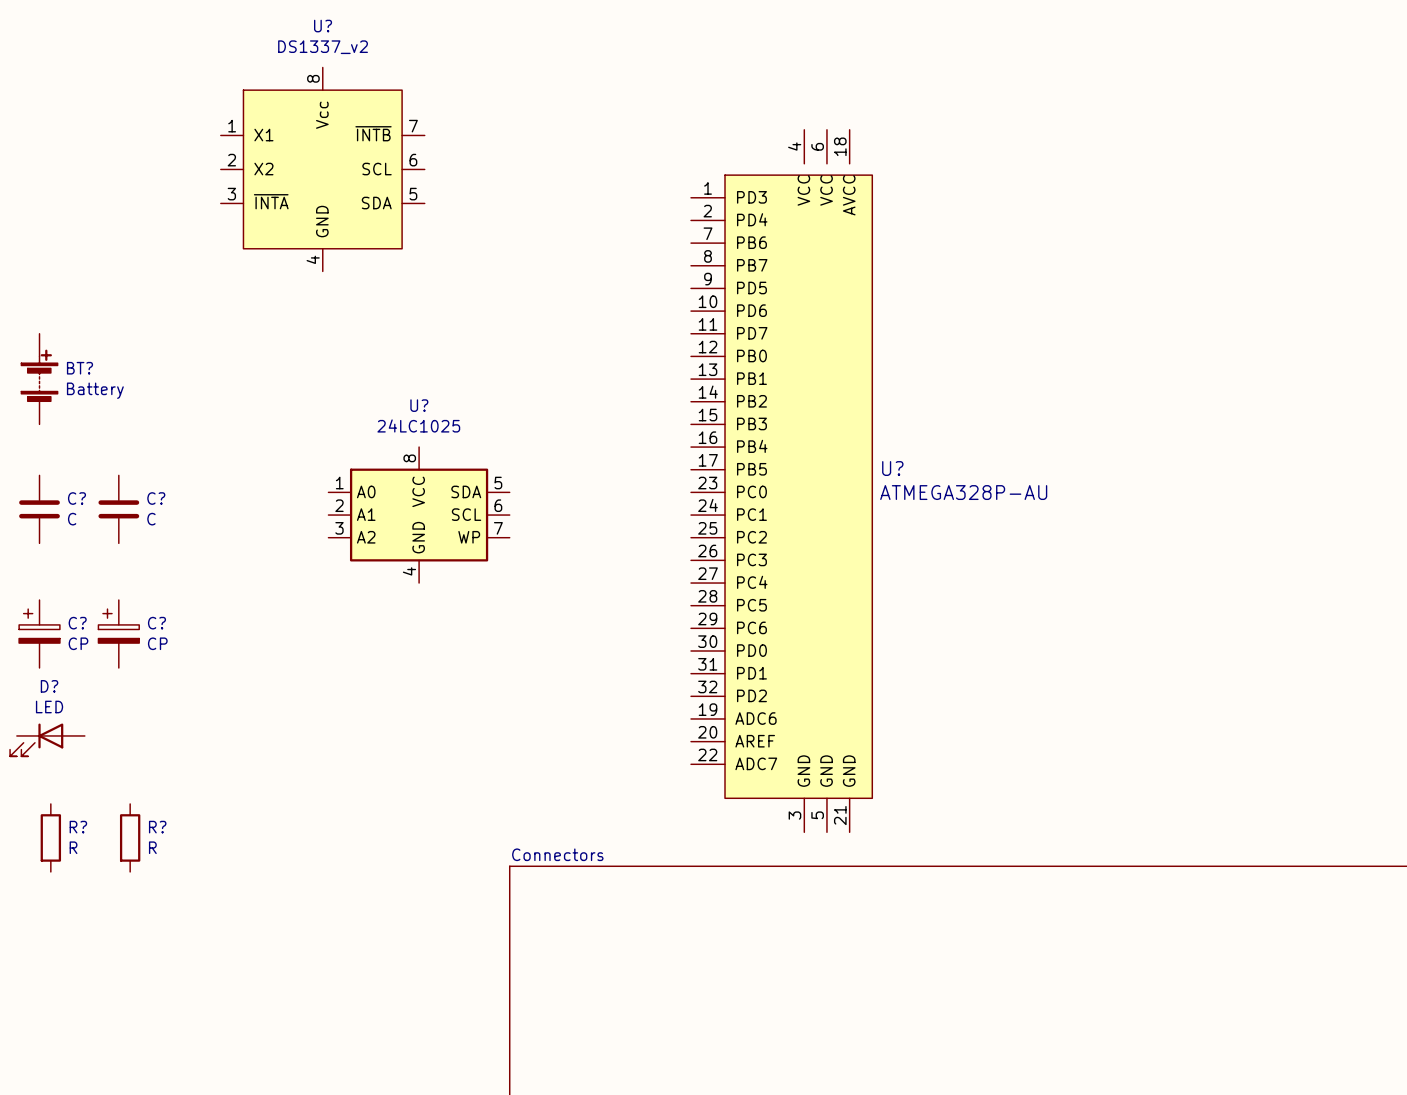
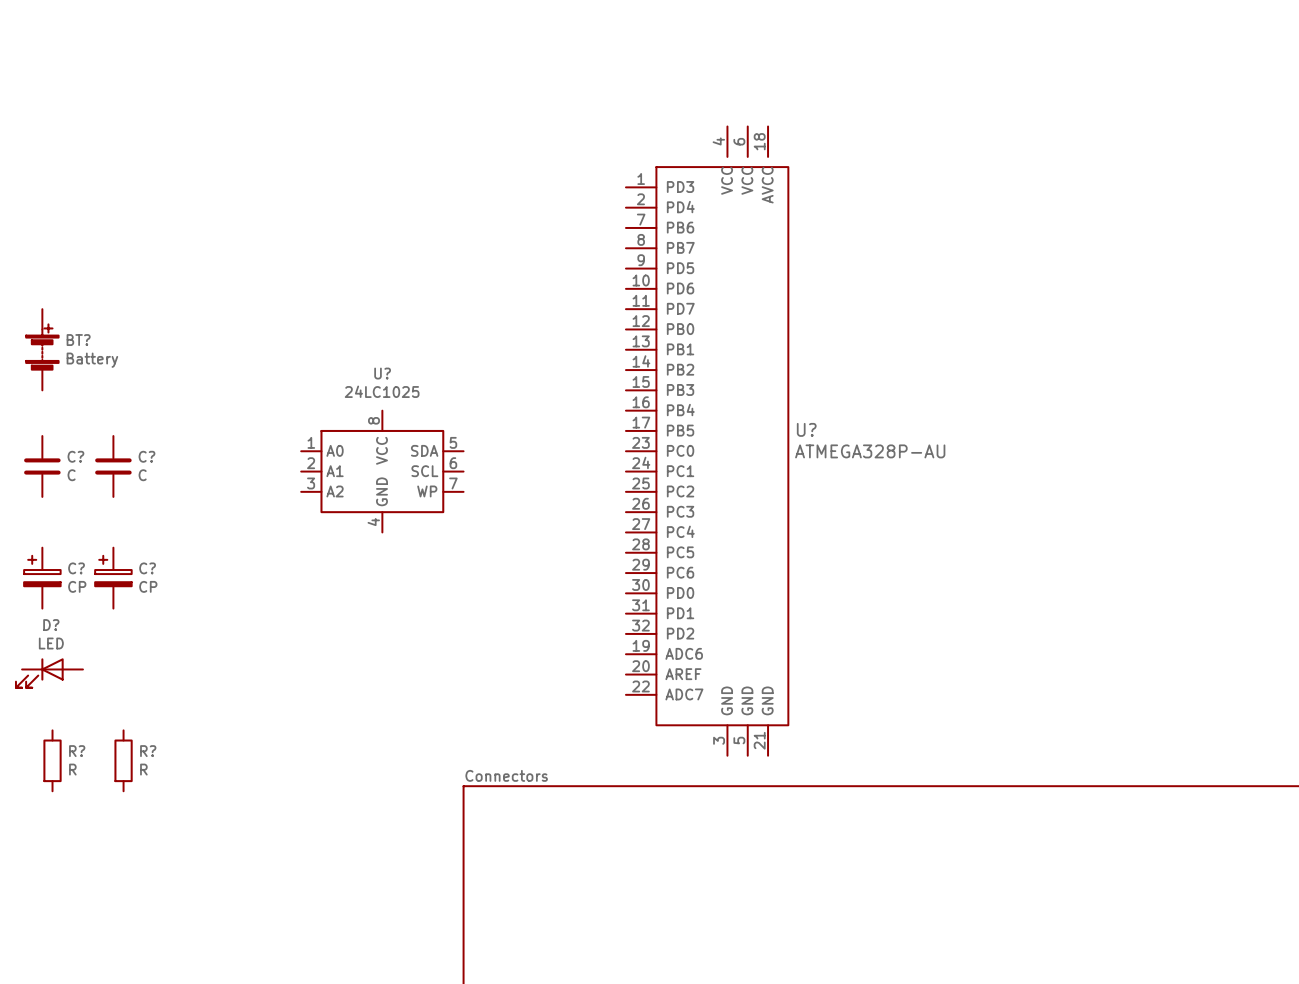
U?: DS1337_v2 (322, 169) -> none

